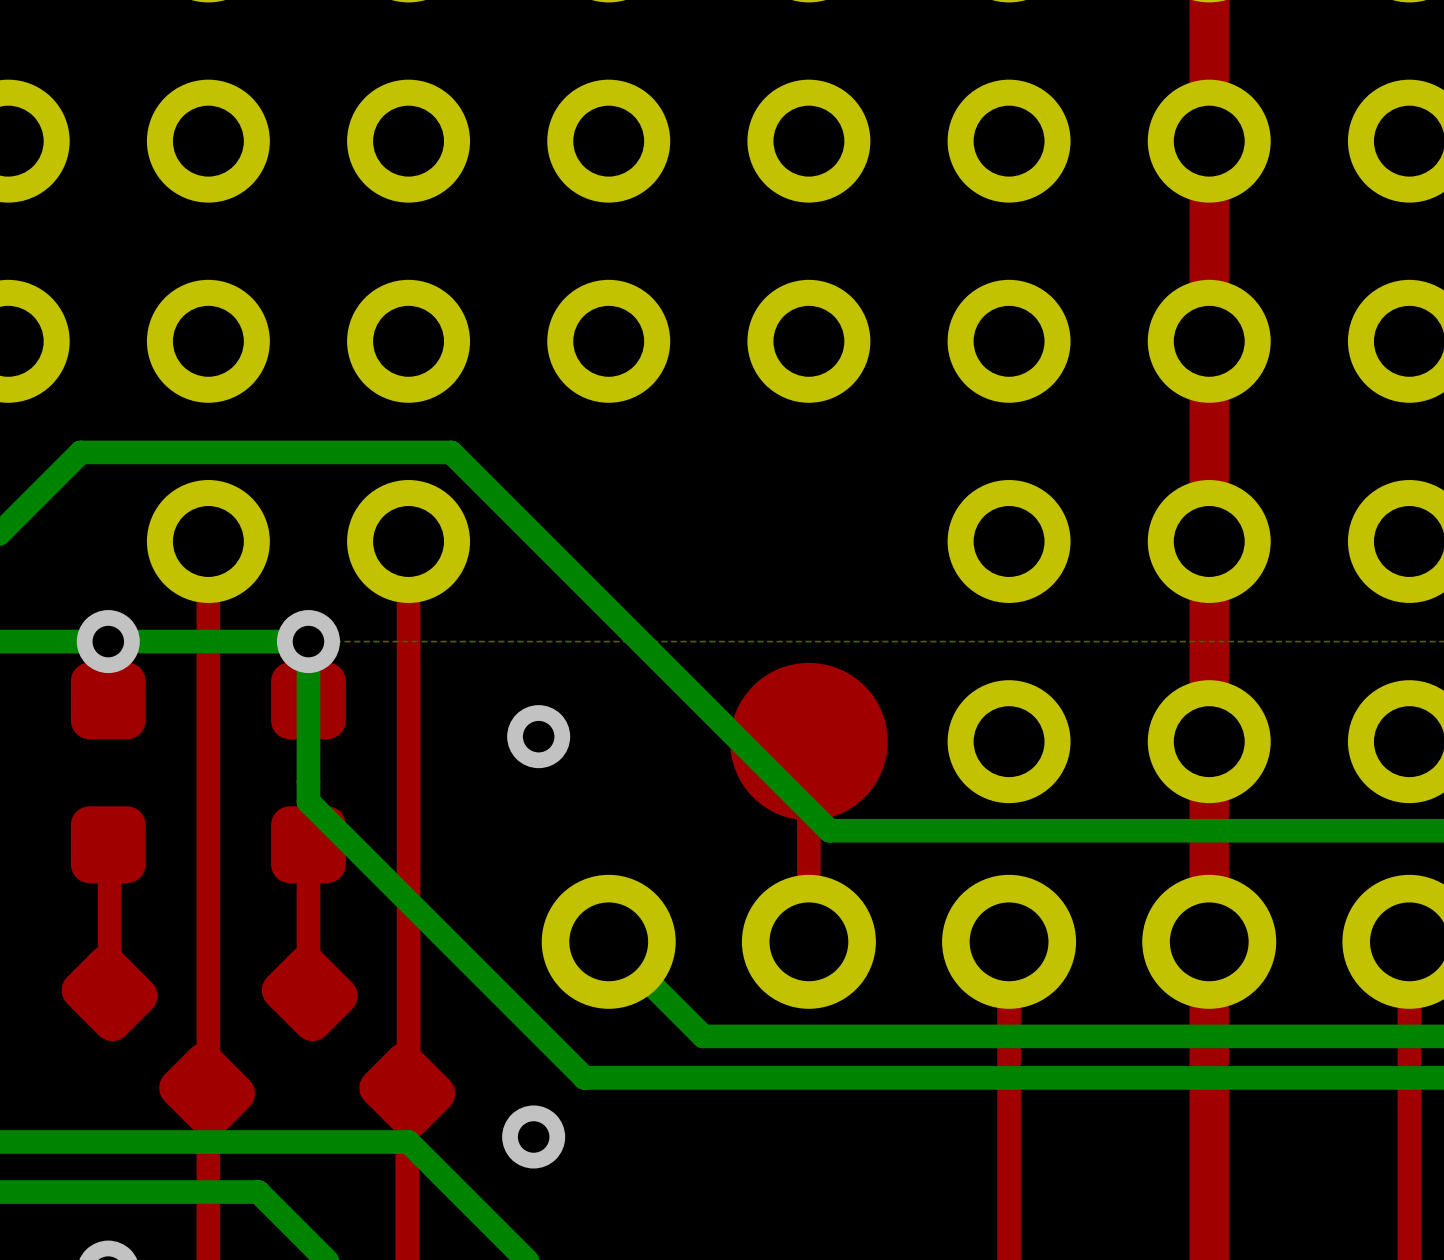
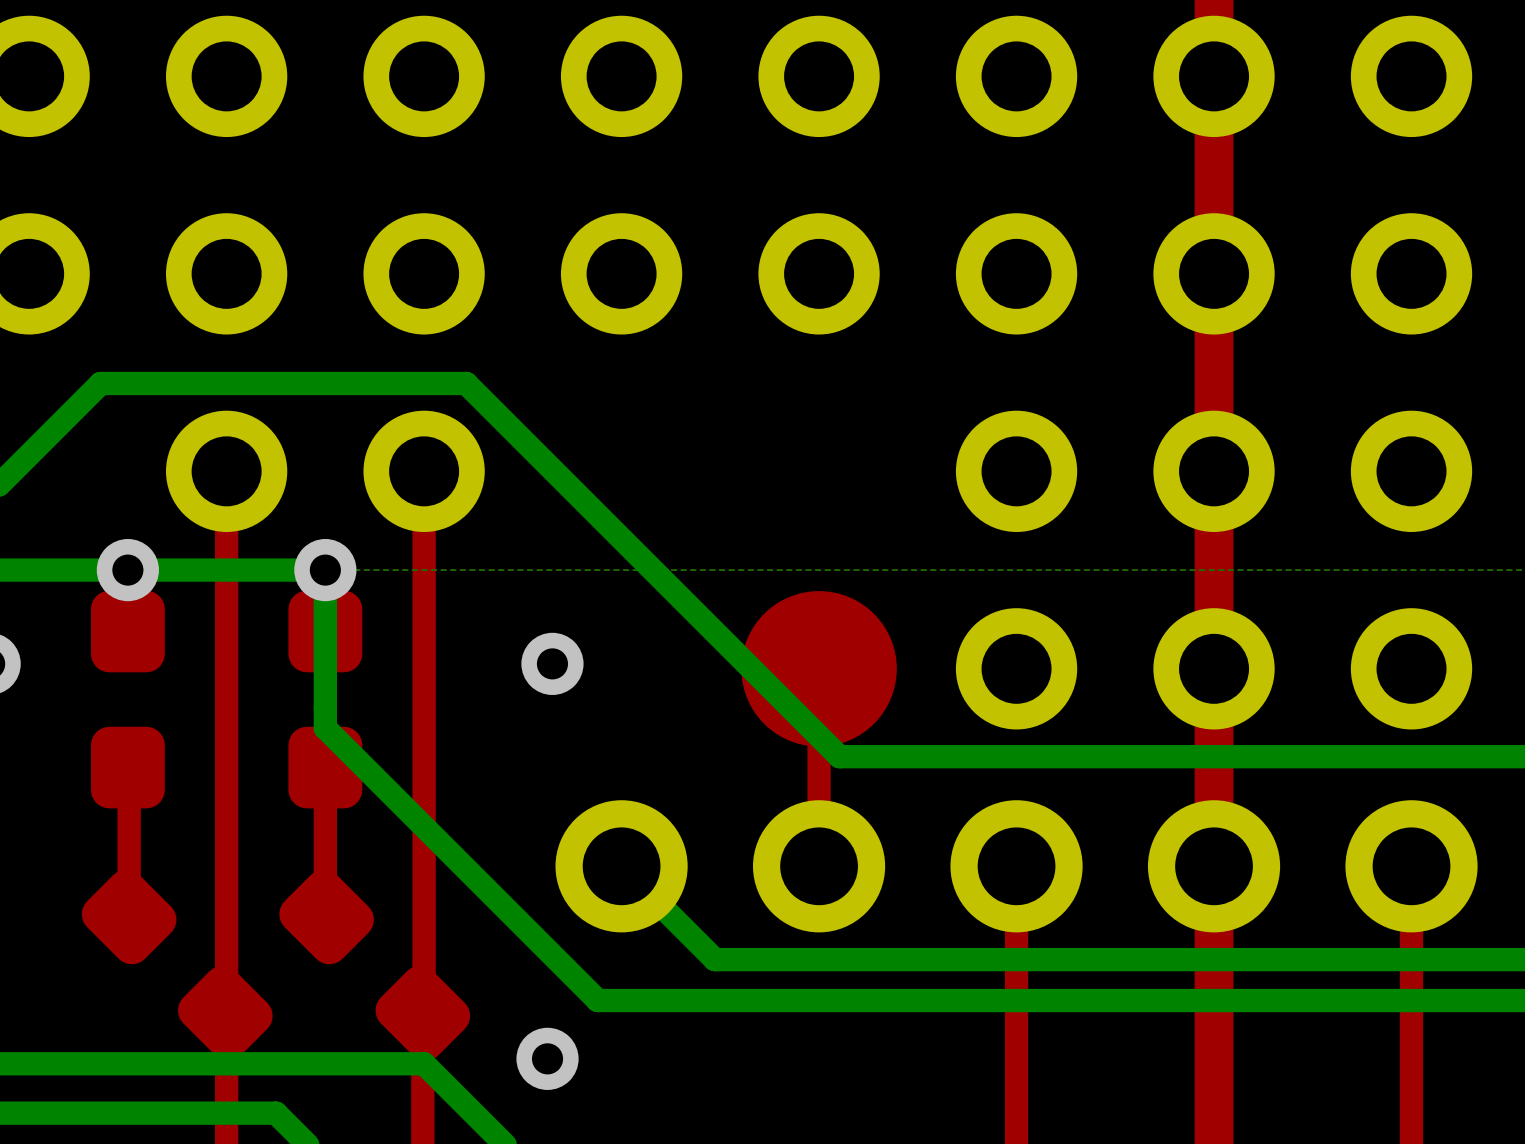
part footprint: [70, 662, 146, 884] -> [90, 590, 165, 809]
part footprint: [271, 662, 346, 884] -> [288, 590, 363, 809]

